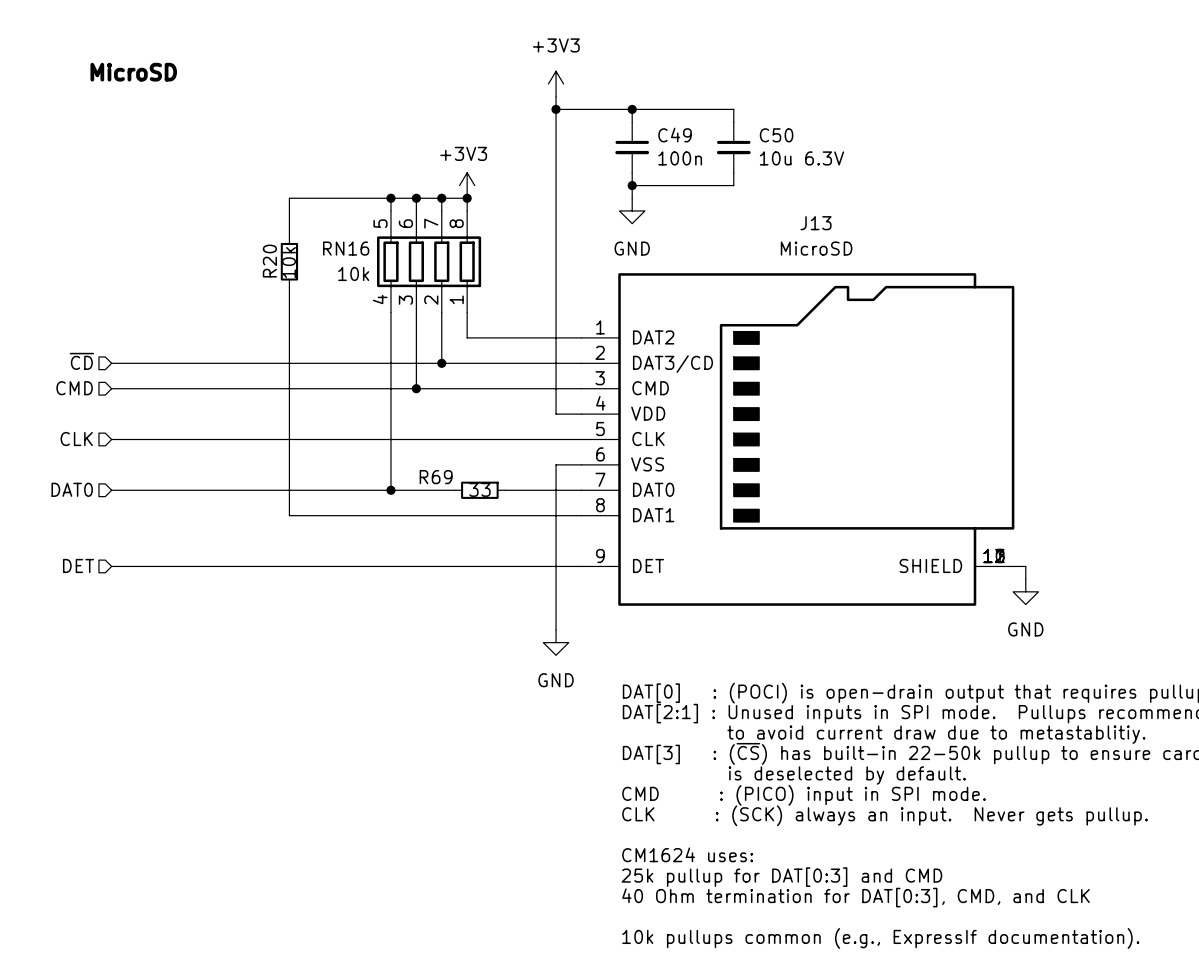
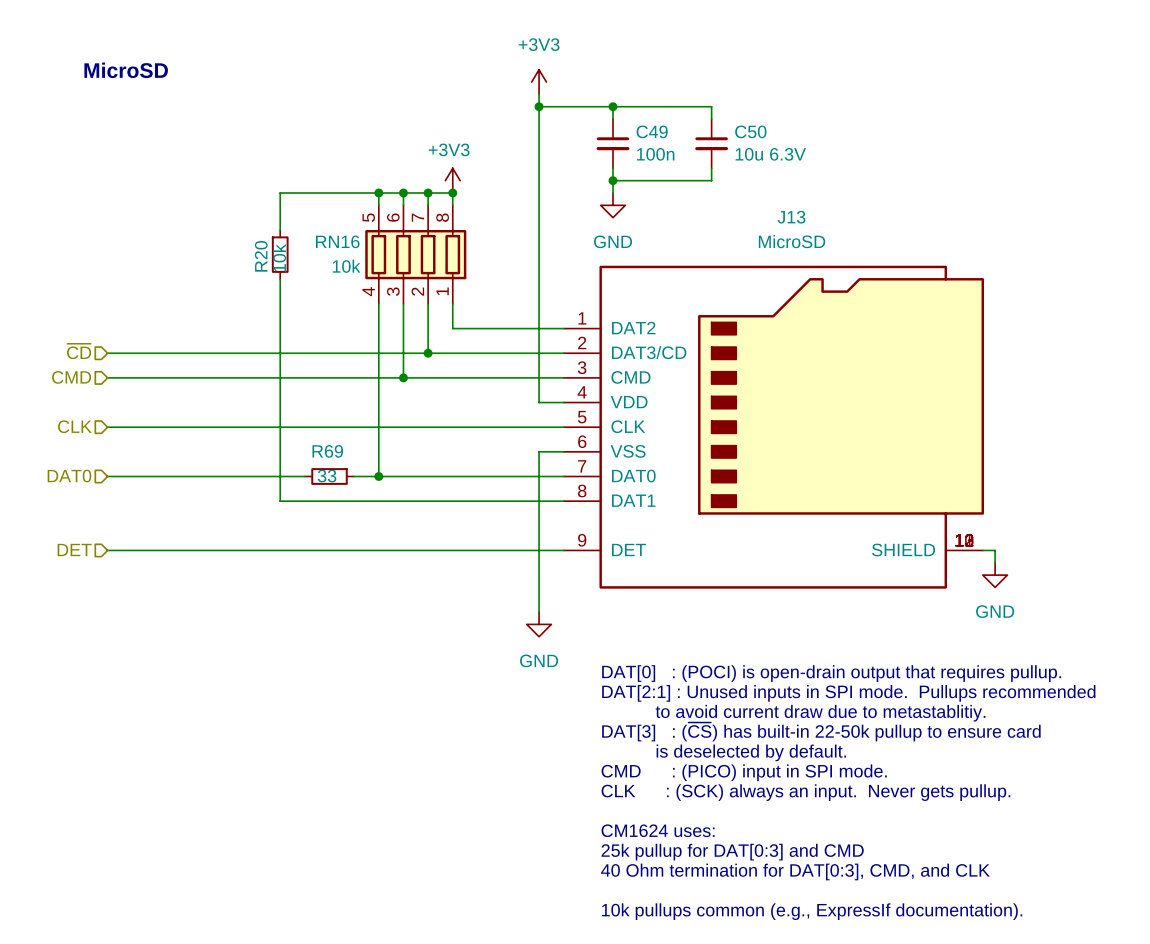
R69 name position: R69 (436, 477) -> R69 (327, 451)
wire: (314, 490) (365, 490) -> (440, 476) (489, 476)
R69 position: (479, 490) -> (329, 476)

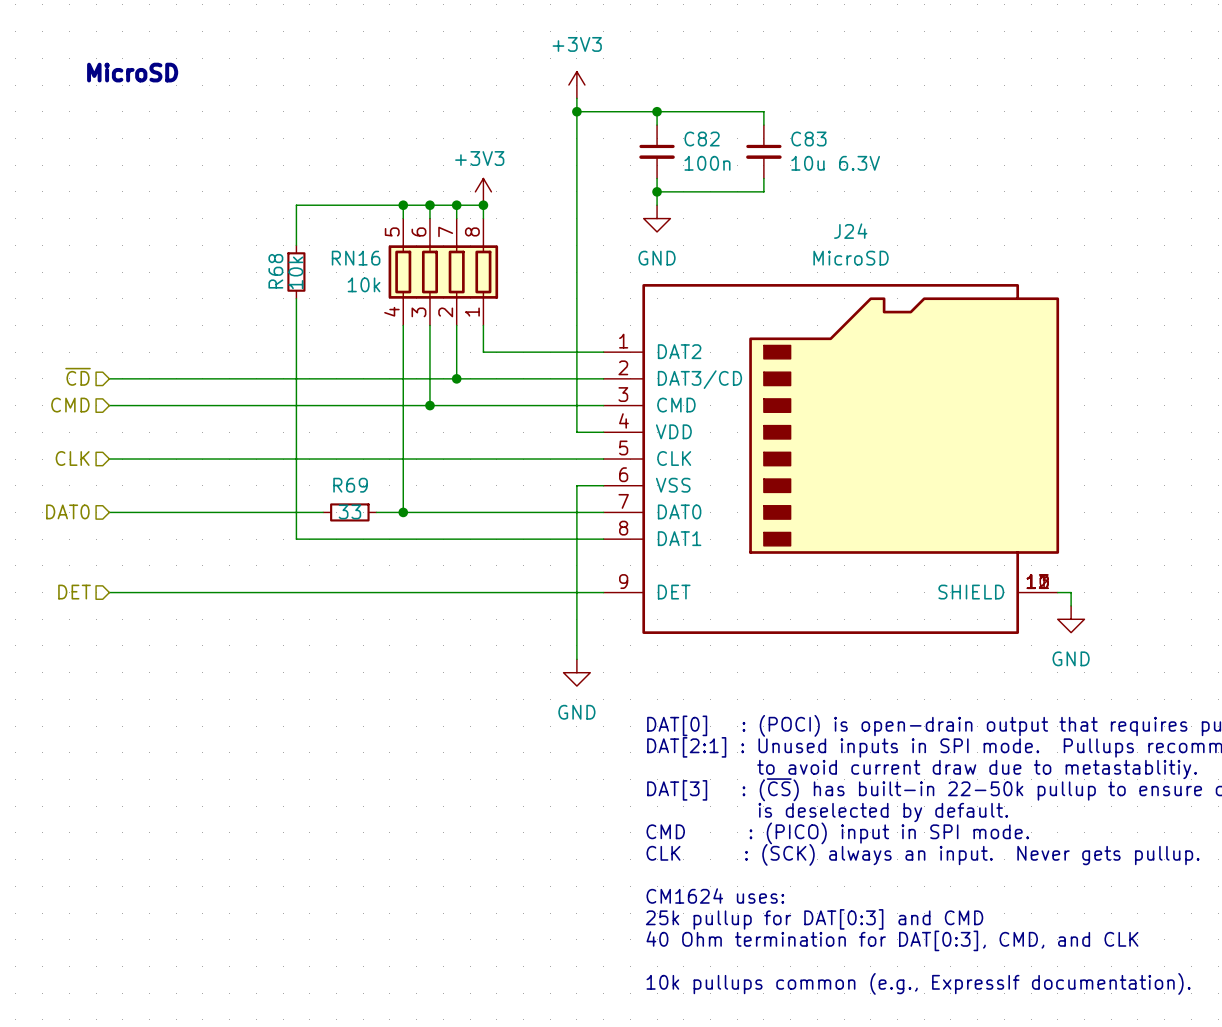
C49 name: C49 (652, 131) -> C82 (702, 139)
C50 name: C50 (750, 131) -> C83 (808, 139)
J13 name: J13 (791, 217) -> J24 (850, 231)
R20 name: R20 (261, 256) -> R68 (275, 271)

